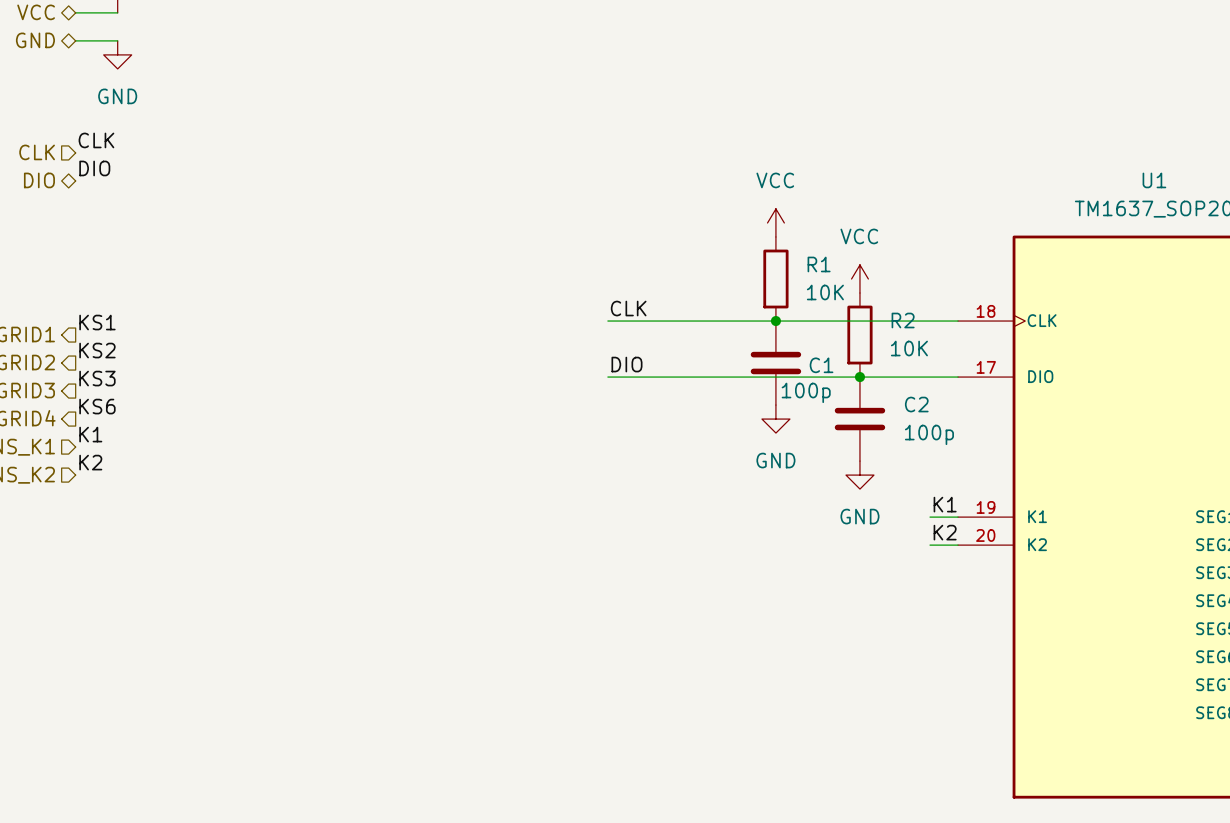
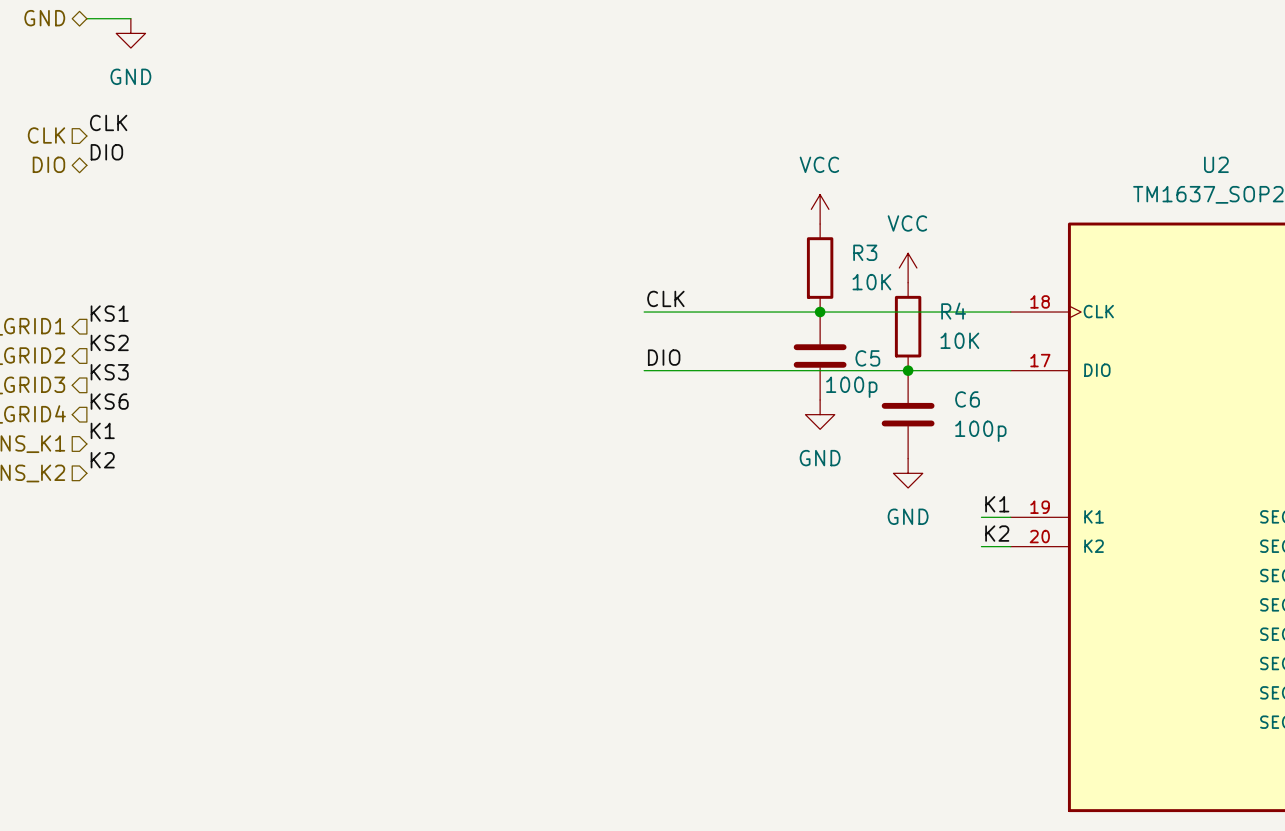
U1 name: U1 (1154, 180) -> U2 (1216, 164)
R1 name: R1 (819, 264) -> R3 (865, 252)
R2 name: R2 (903, 320) -> R4 (953, 311)
C1 name: C1 (821, 365) -> C5 (867, 358)
C2 name: C2 (916, 404) -> C6 (967, 399)

